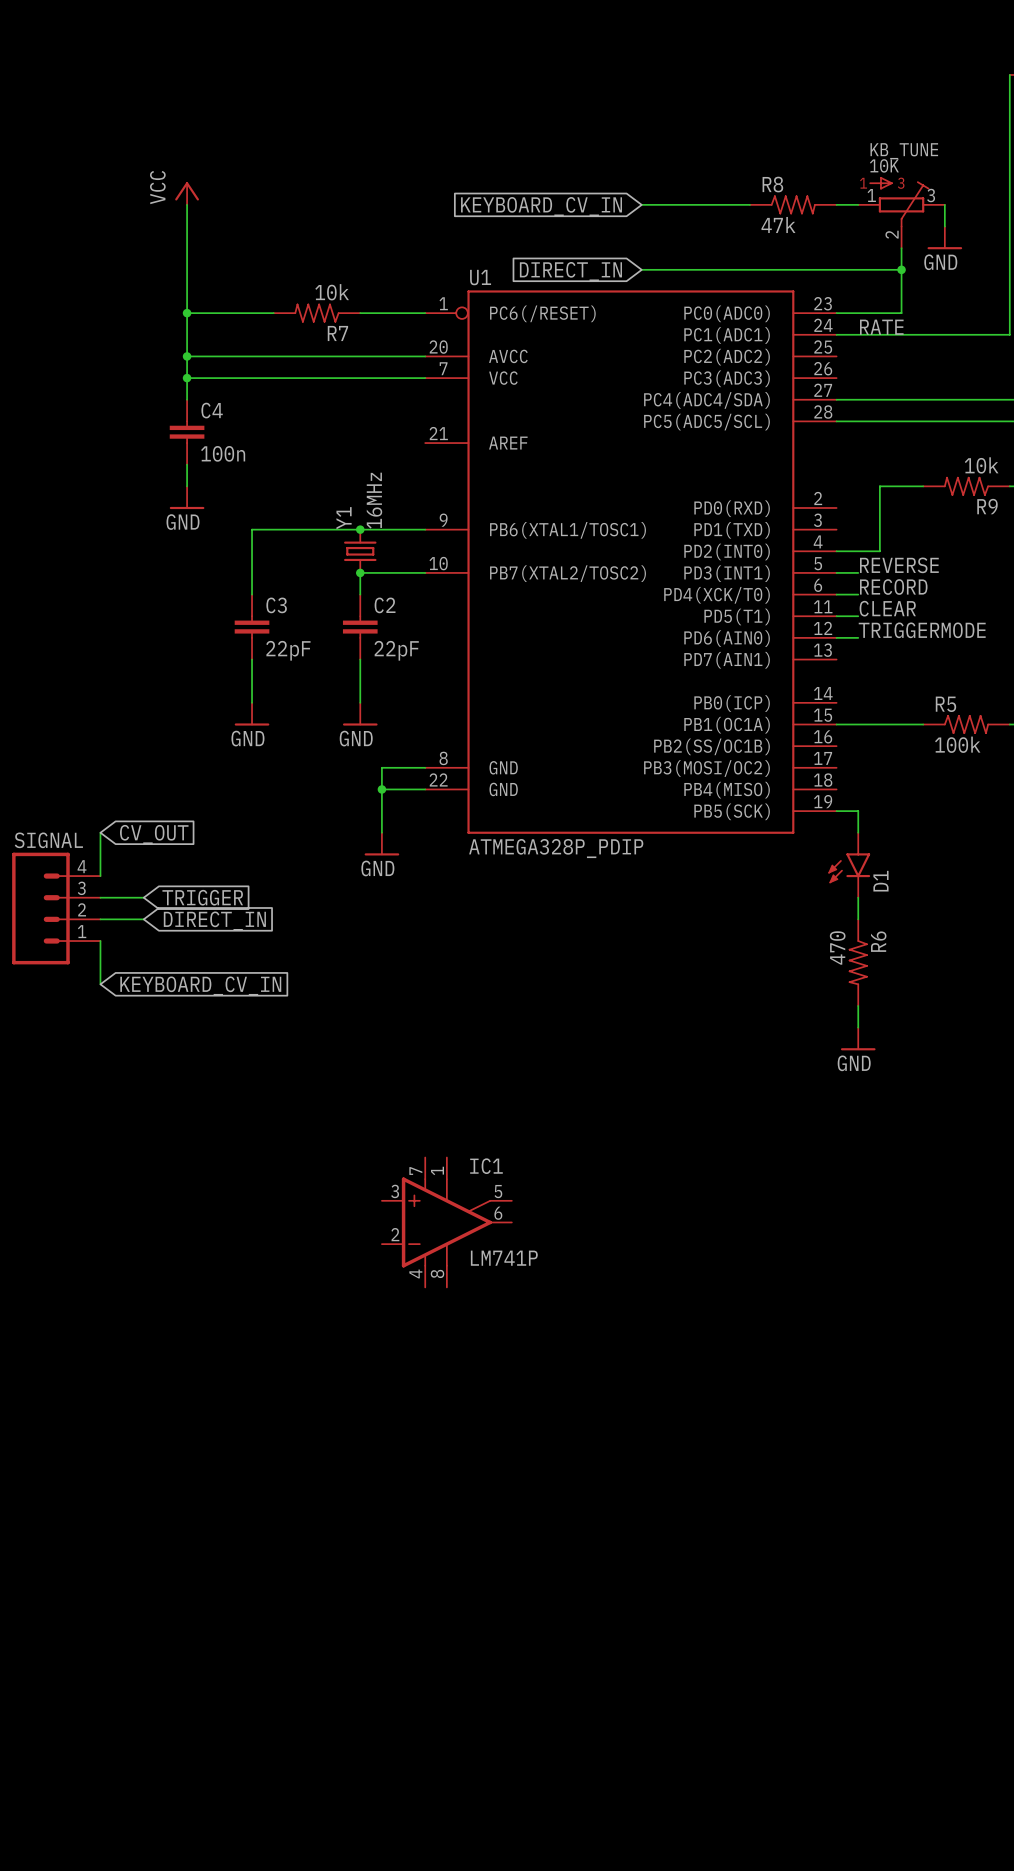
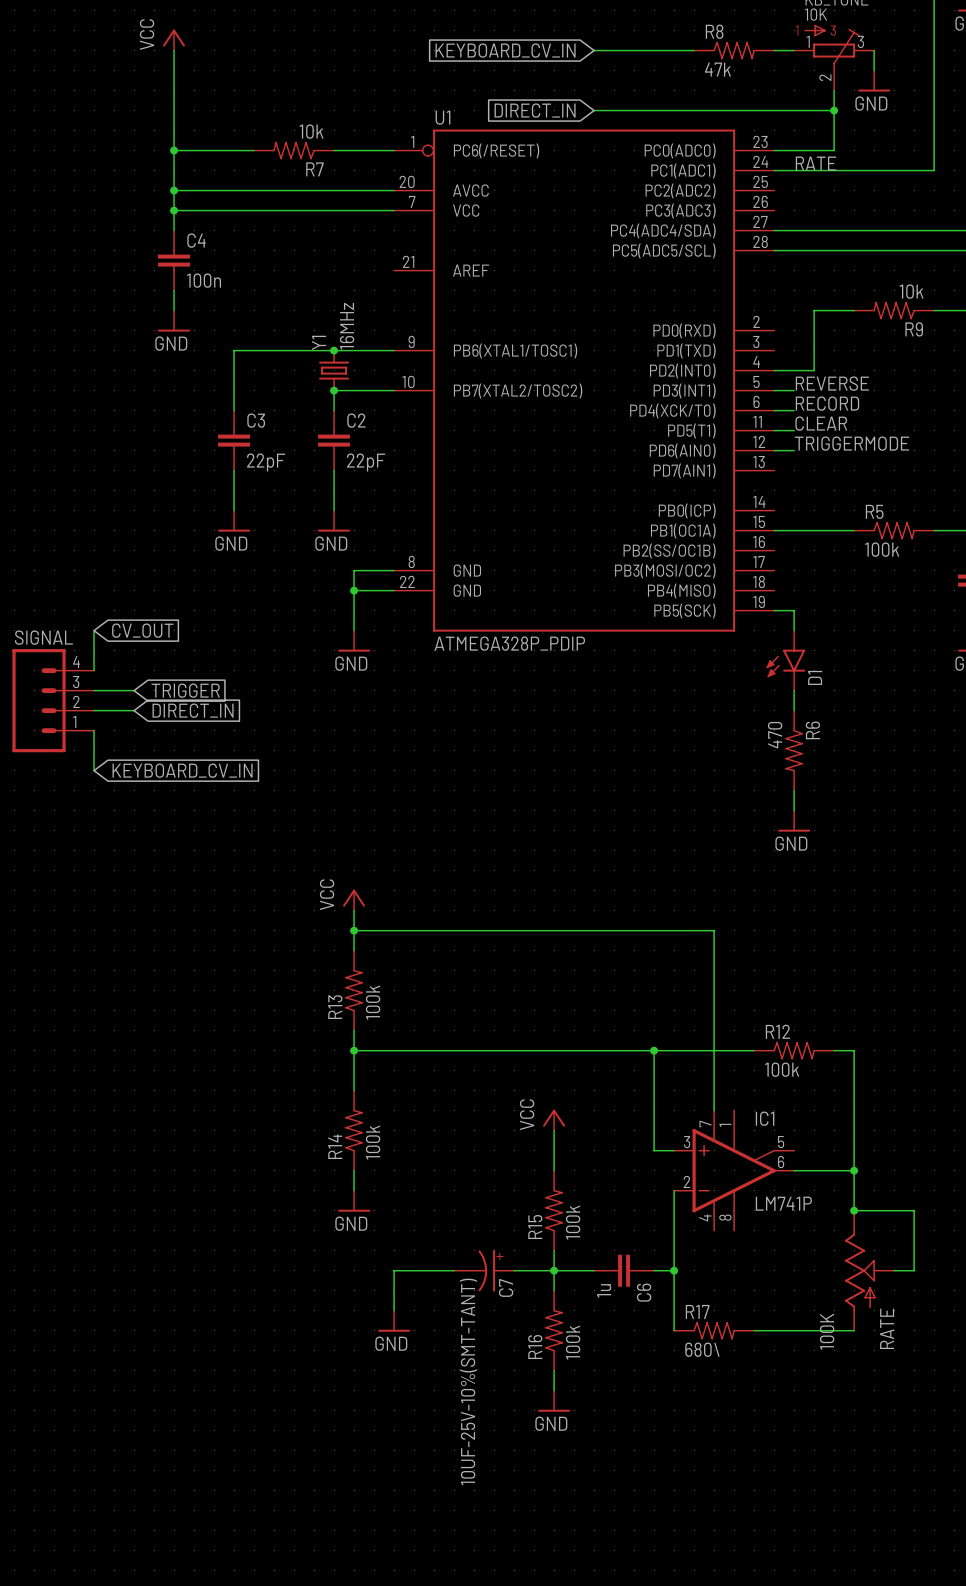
power symbol: none -> VCC (354, 900)
wire: none -> (354, 910) (354, 950)
wire: none -> (354, 930) (714, 930) (714, 1110)
junction: none -> (354, 930)
R13: none -> 100k (354, 990)
IC1 position: (446, 1222) -> (734, 1170)
wire: none -> (354, 1030) (354, 1090)
wire: none -> (354, 1050) (754, 1050)
junction: none -> (354, 1050)
wire: none -> (654, 1050) (654, 1150) (674, 1150)
junction: none -> (654, 1050)
R12: none -> 100k (794, 1050)
wire: none -> (834, 1050) (854, 1050) (854, 1210) (914, 1210) (914, 1270) (894, 1270)
power symbol: none -> VCC (554, 1120)
R14: none -> 100k (354, 1130)
wire: none -> (554, 1130) (554, 1170)
wire: none -> (354, 1170) (354, 1190)
wire: none -> (794, 1170) (854, 1170)
junction: none -> (854, 1170)
wire: none -> (674, 1190) (674, 1330)
power symbol: none -> GND (354, 1201)
R15: none -> 100k (554, 1210)
junction: none -> (854, 1210)
wire: none -> (554, 1250) (554, 1290)
wire: none -> (454, 1270) (394, 1270) (394, 1310)
C7: none -> 10UF-25V-10%(SMT-TANT) (484, 1270)
wire: none -> (514, 1270) (594, 1270)
junction: none -> (554, 1270)
C6: none -> 1u (624, 1270)
wire: none -> (654, 1270) (674, 1270)
junction: none -> (674, 1270)
RATE: none -> 100K (869, 1270)
power symbol: none -> GND (394, 1321)
R16: none -> 100k (554, 1330)
R17: none -> 680\ (714, 1330)
wire: none -> (754, 1330) (854, 1330)
wire: none -> (554, 1370) (554, 1390)
power symbol: none -> GND (554, 1401)

